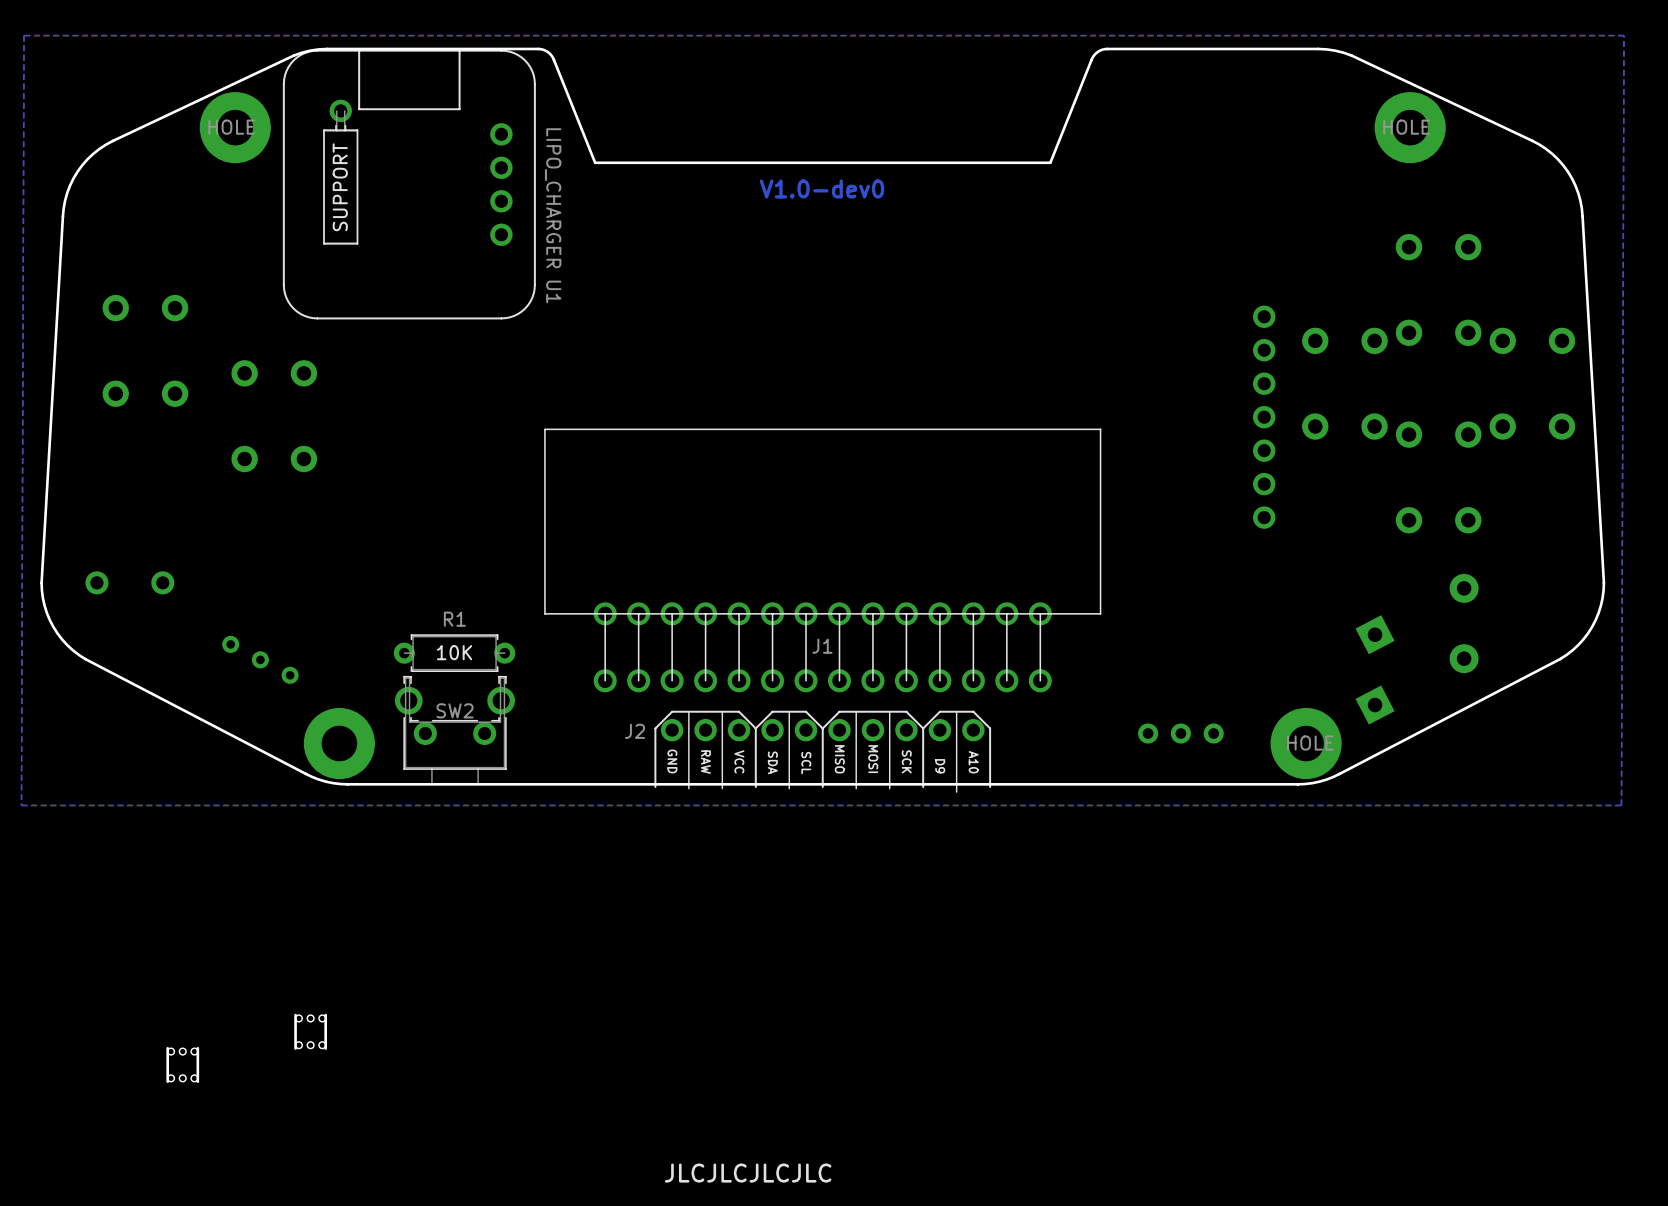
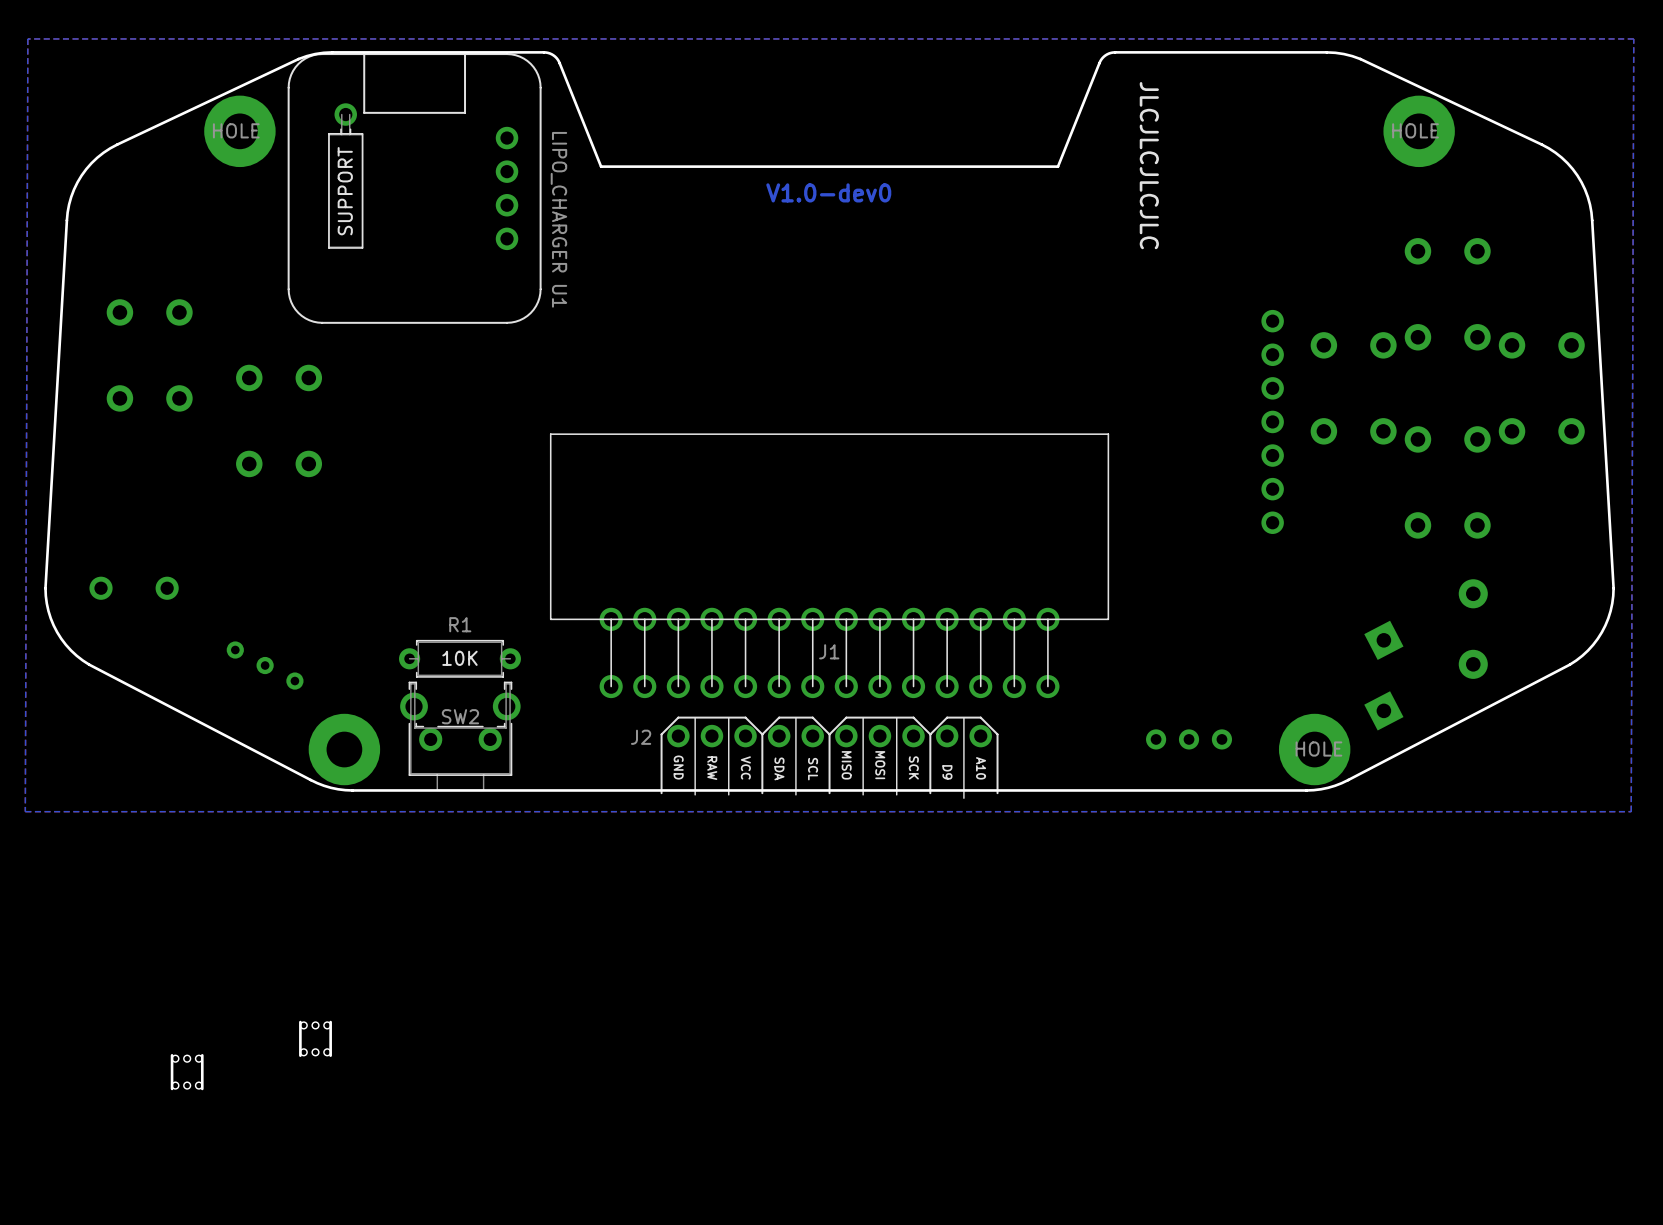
text: none -> JLCJLCJLCJLC (1149, 165)
text: JLCJLCJLCJLC (748, 1173) -> none

